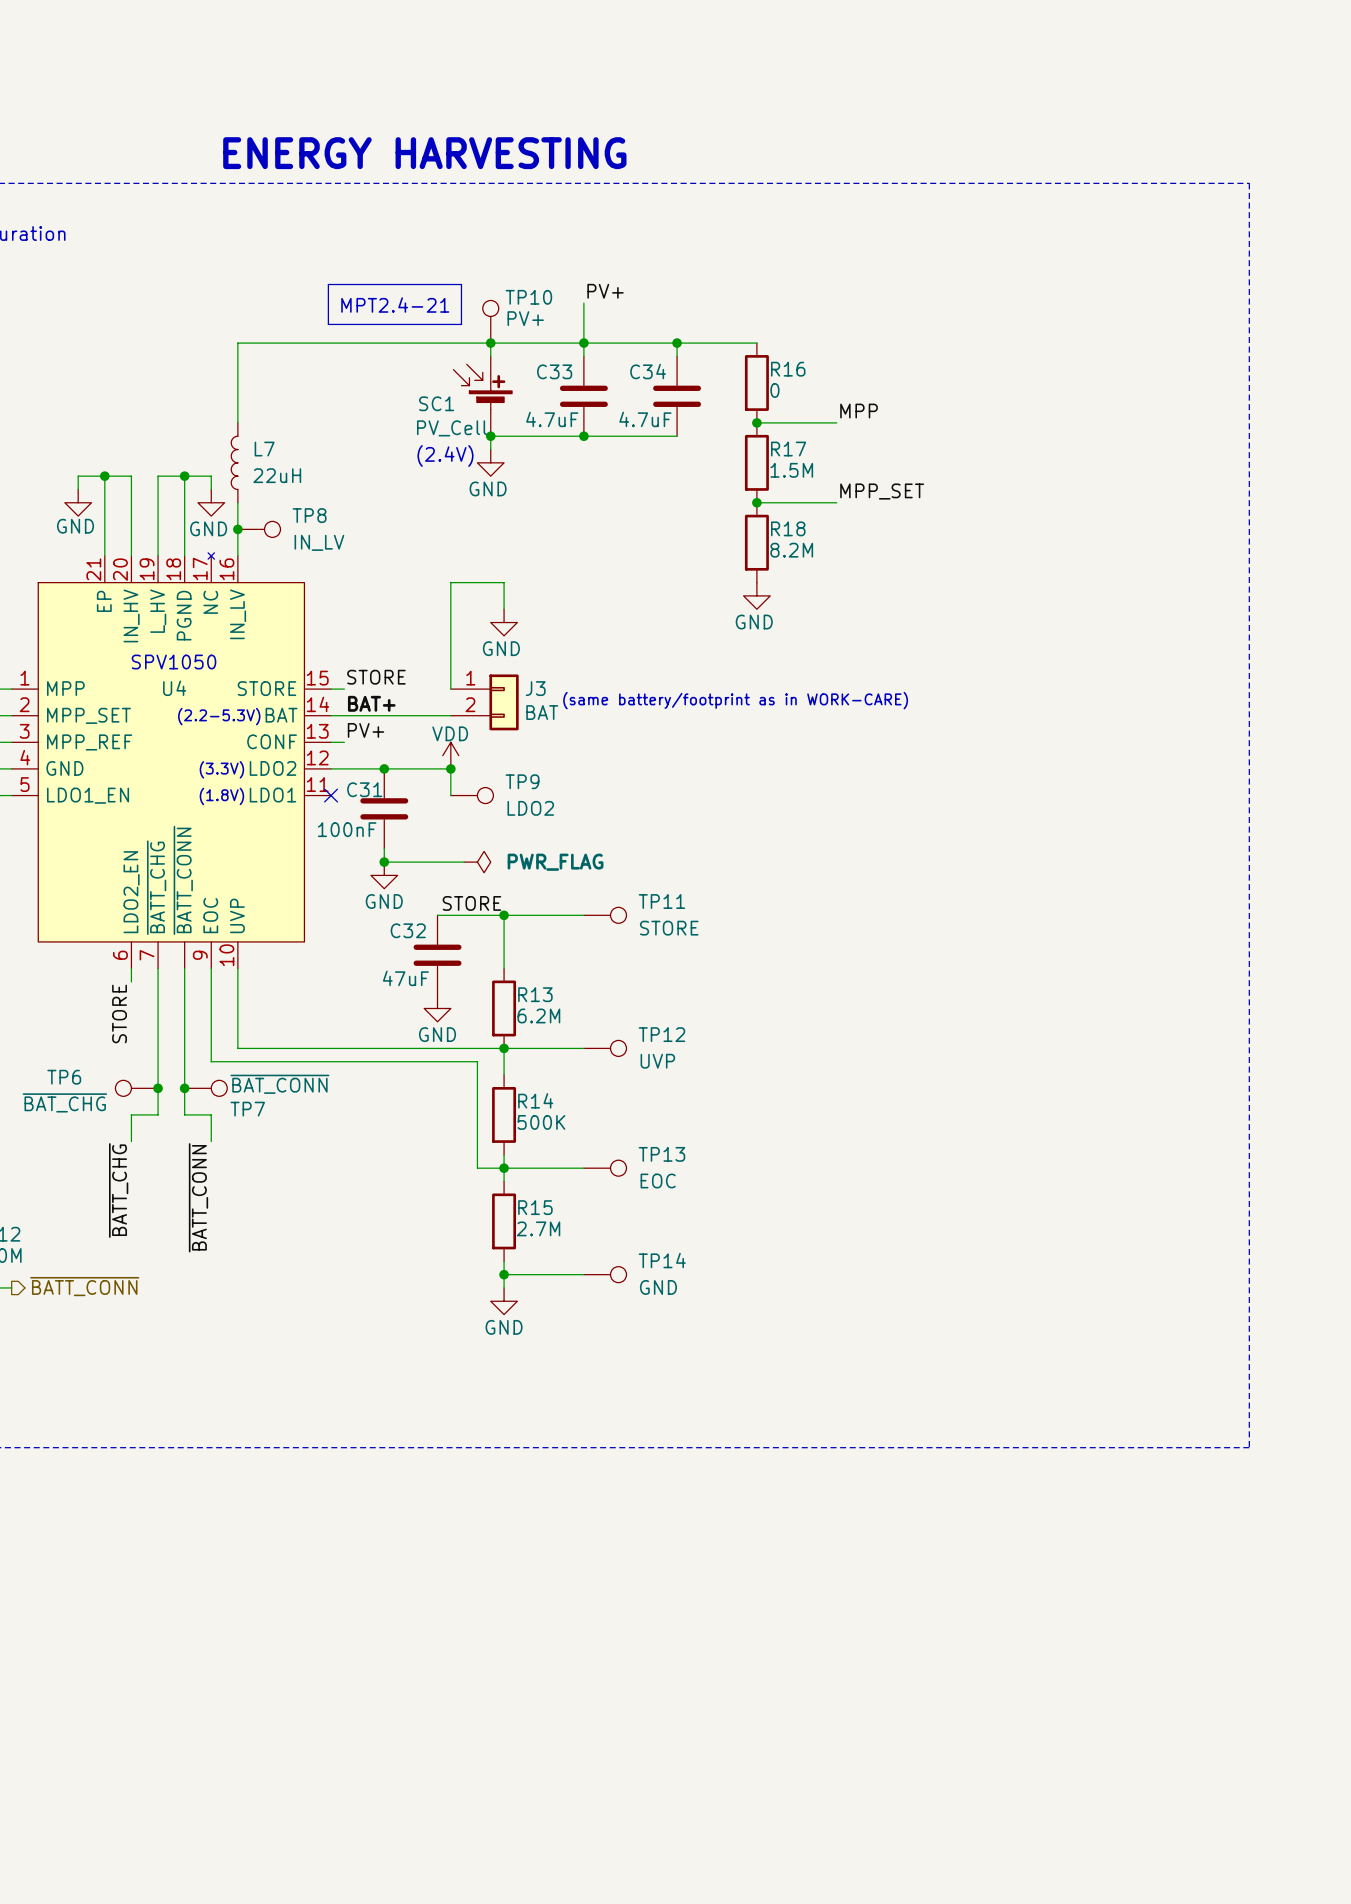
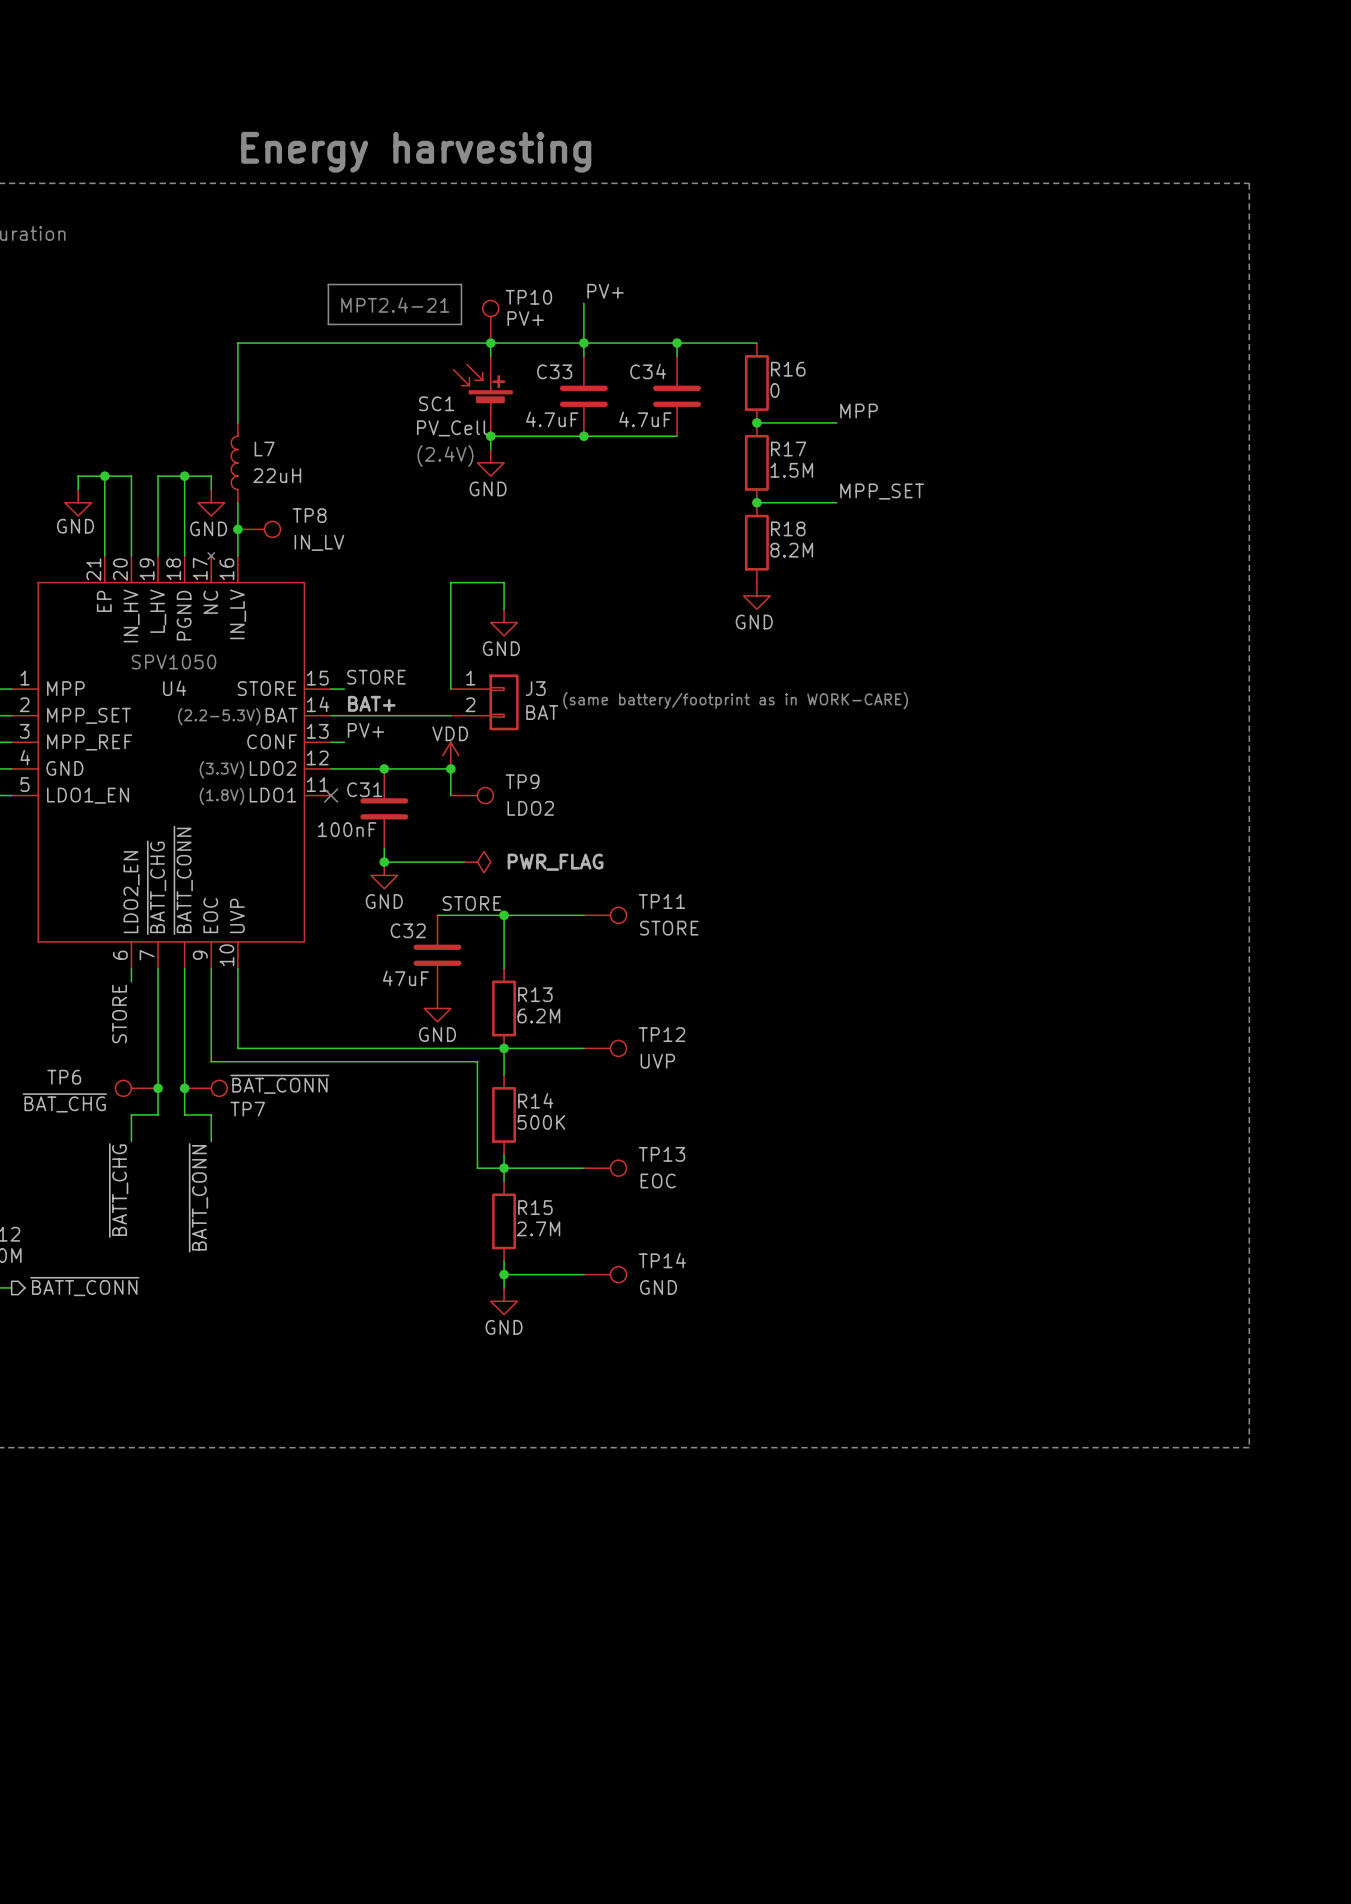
text: ENERGY HARVESTING (424, 153) -> Energy harvesting (416, 152)

